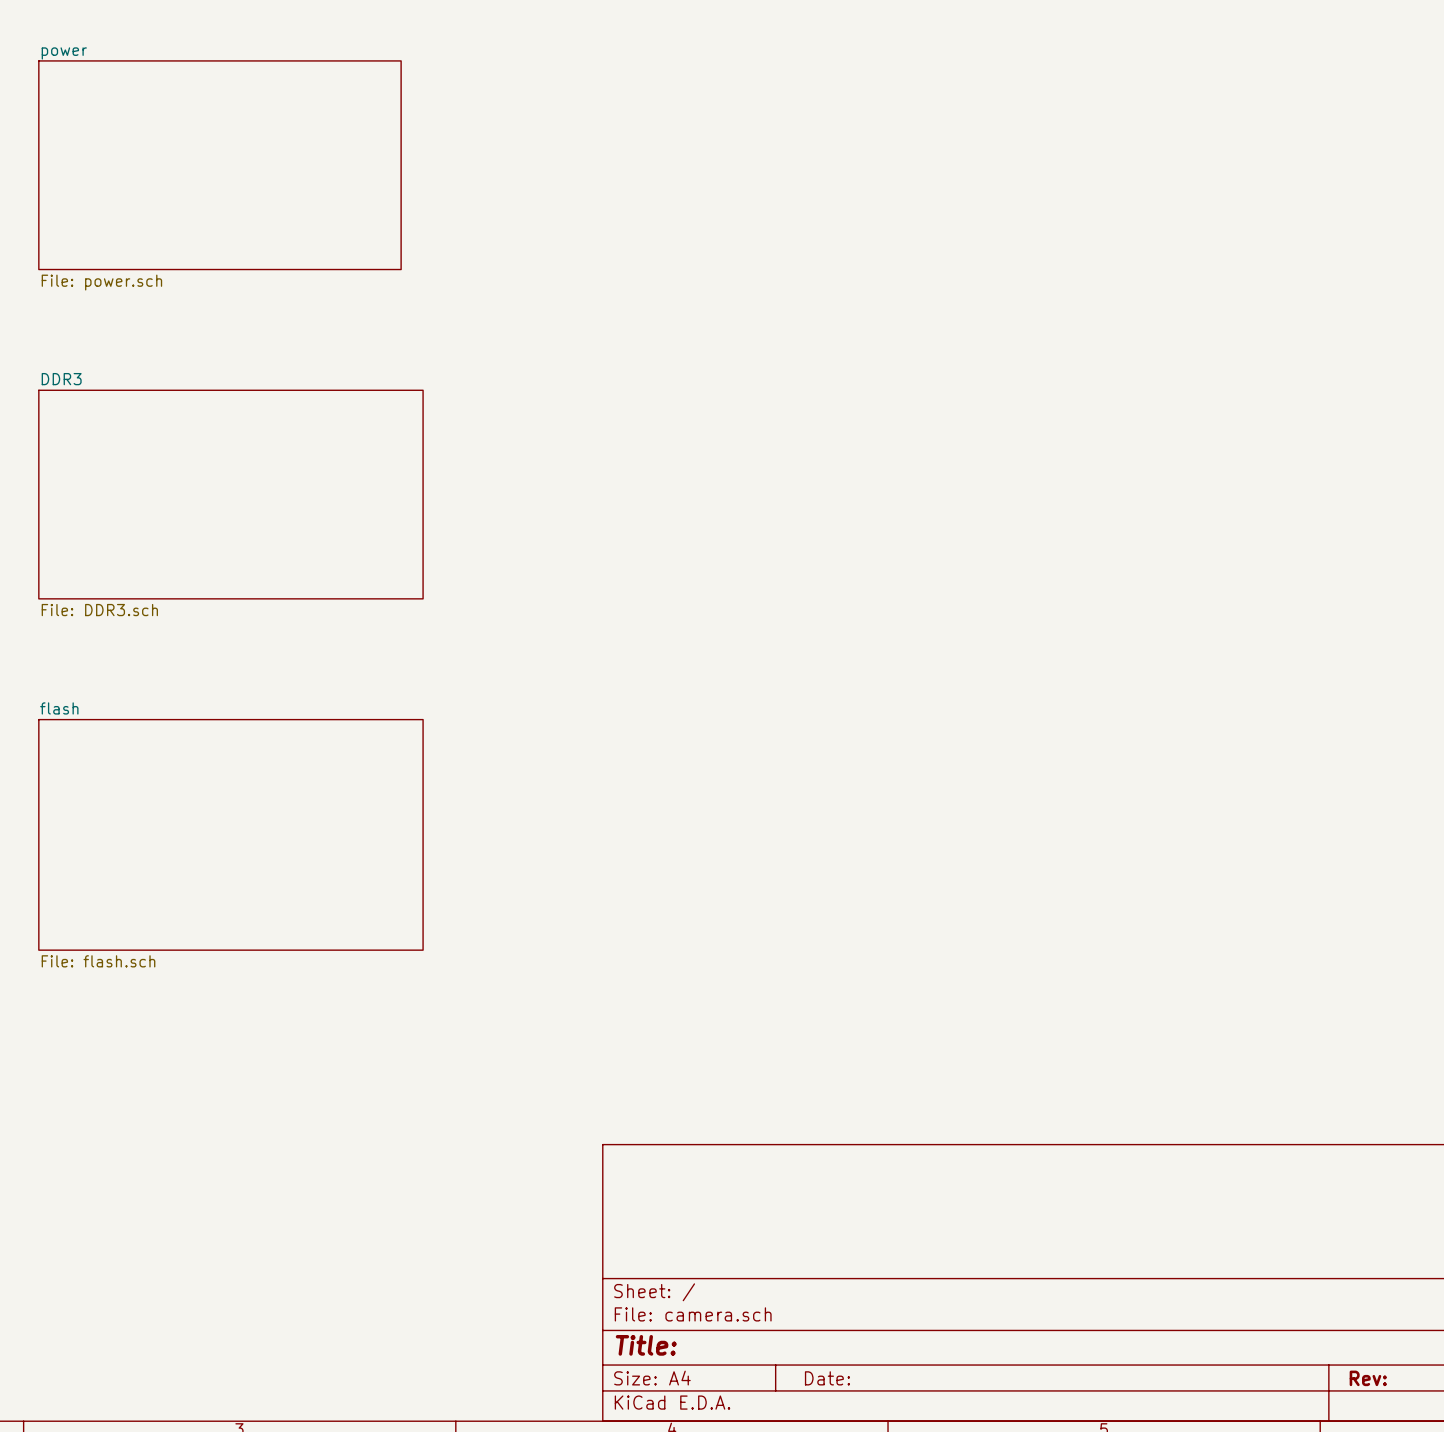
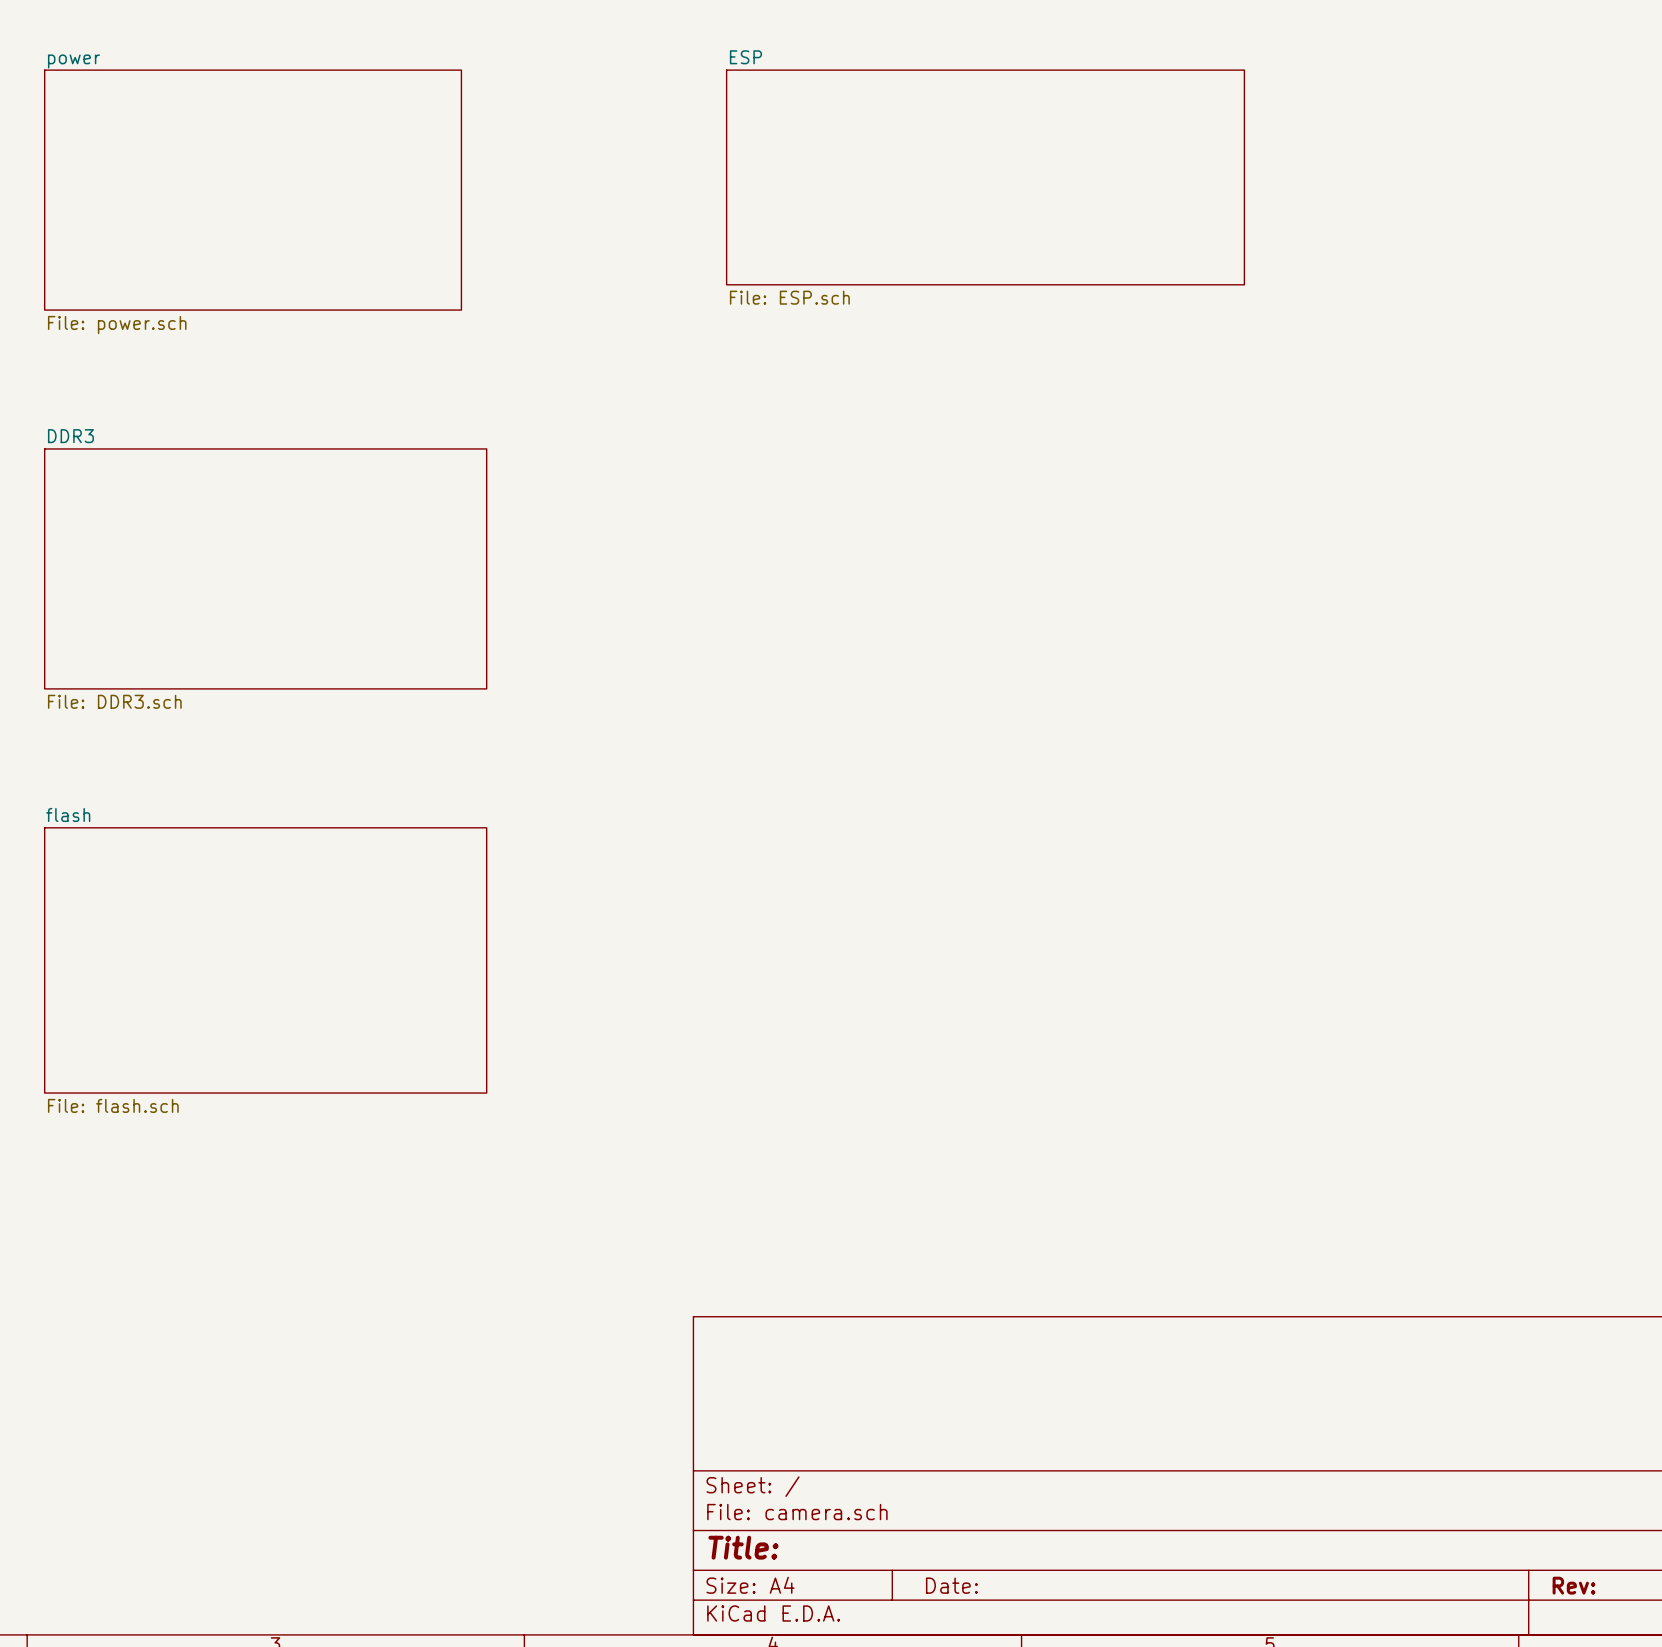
sheet ESP: none -> File: ESP.sch (985, 177)

